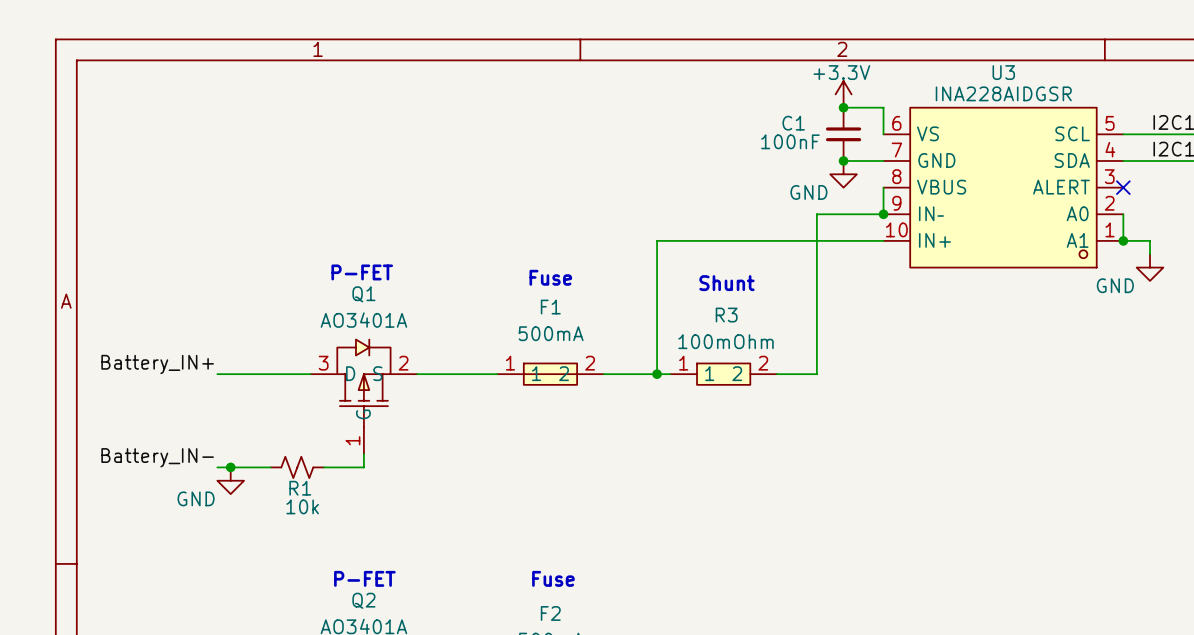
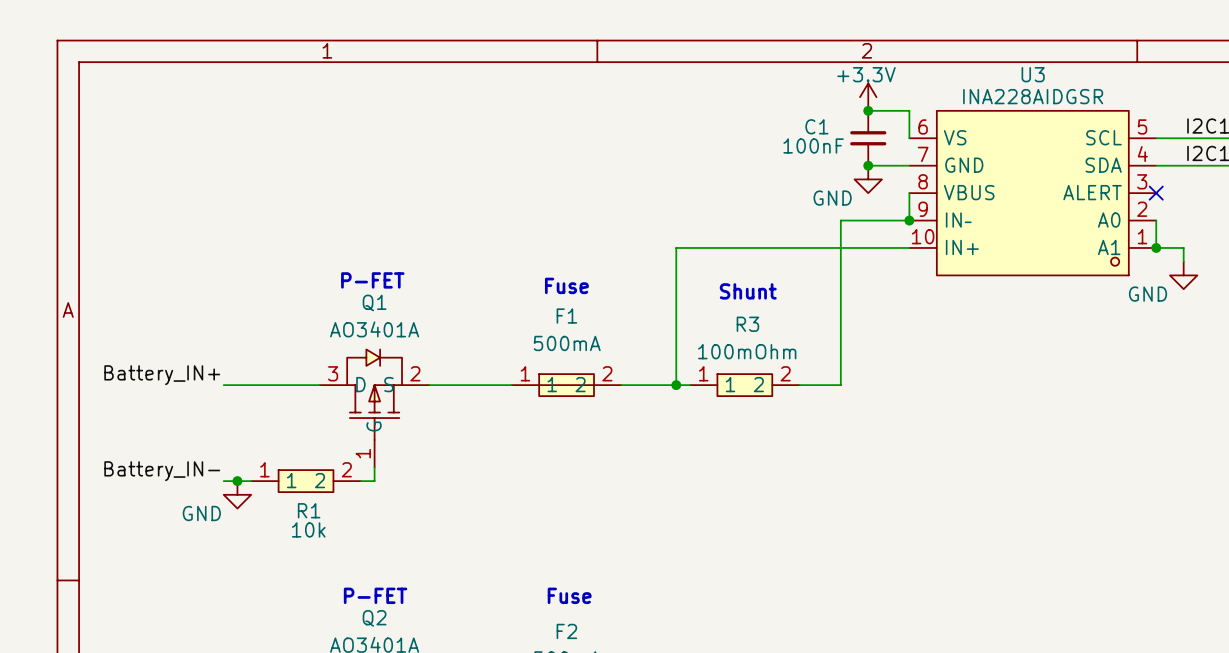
R1 symbol: [270, 456, 324, 479] -> [251, 470, 361, 493]

